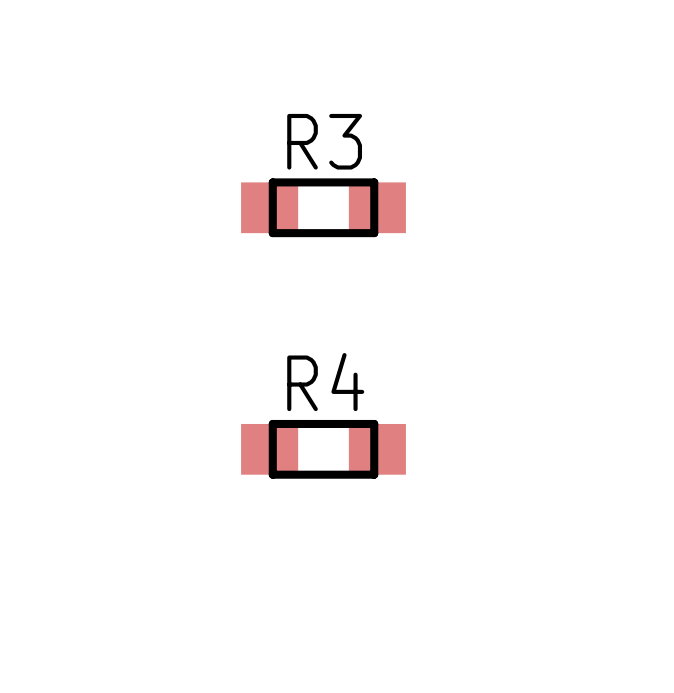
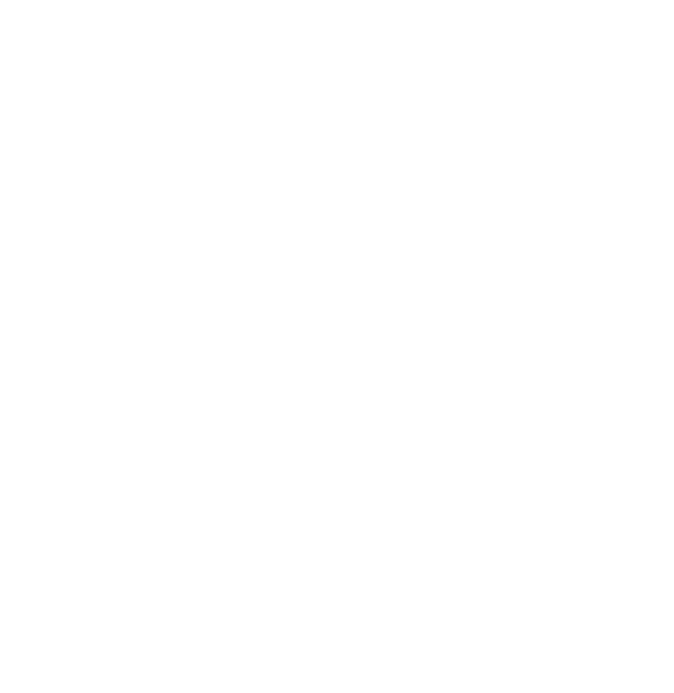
R3: (323, 207) -> none
R4: (323, 449) -> none

